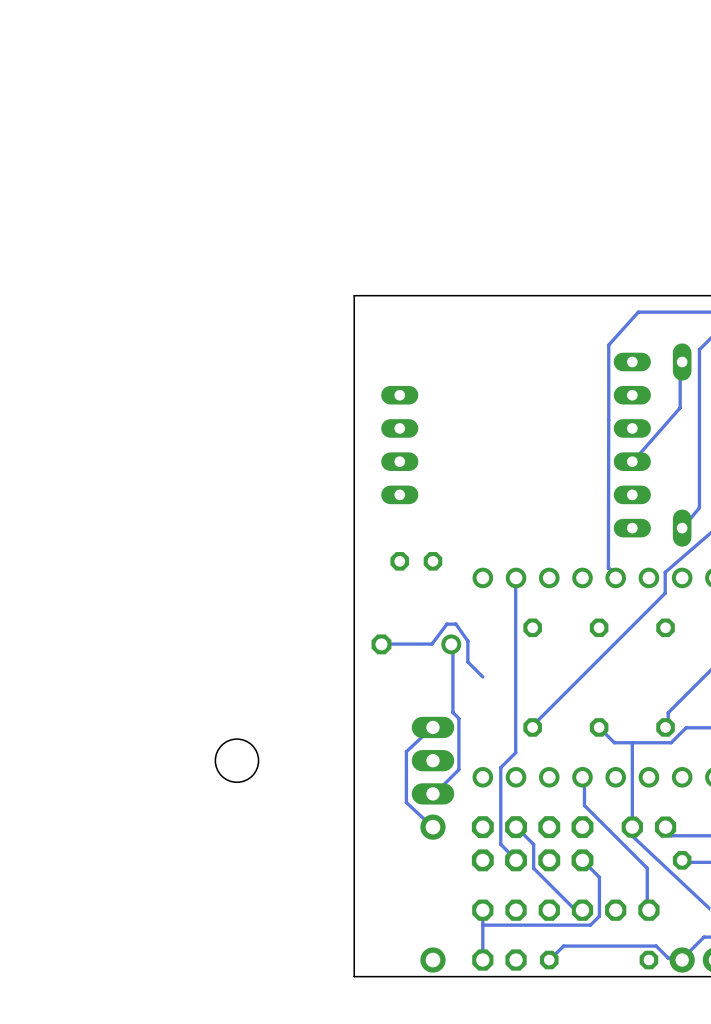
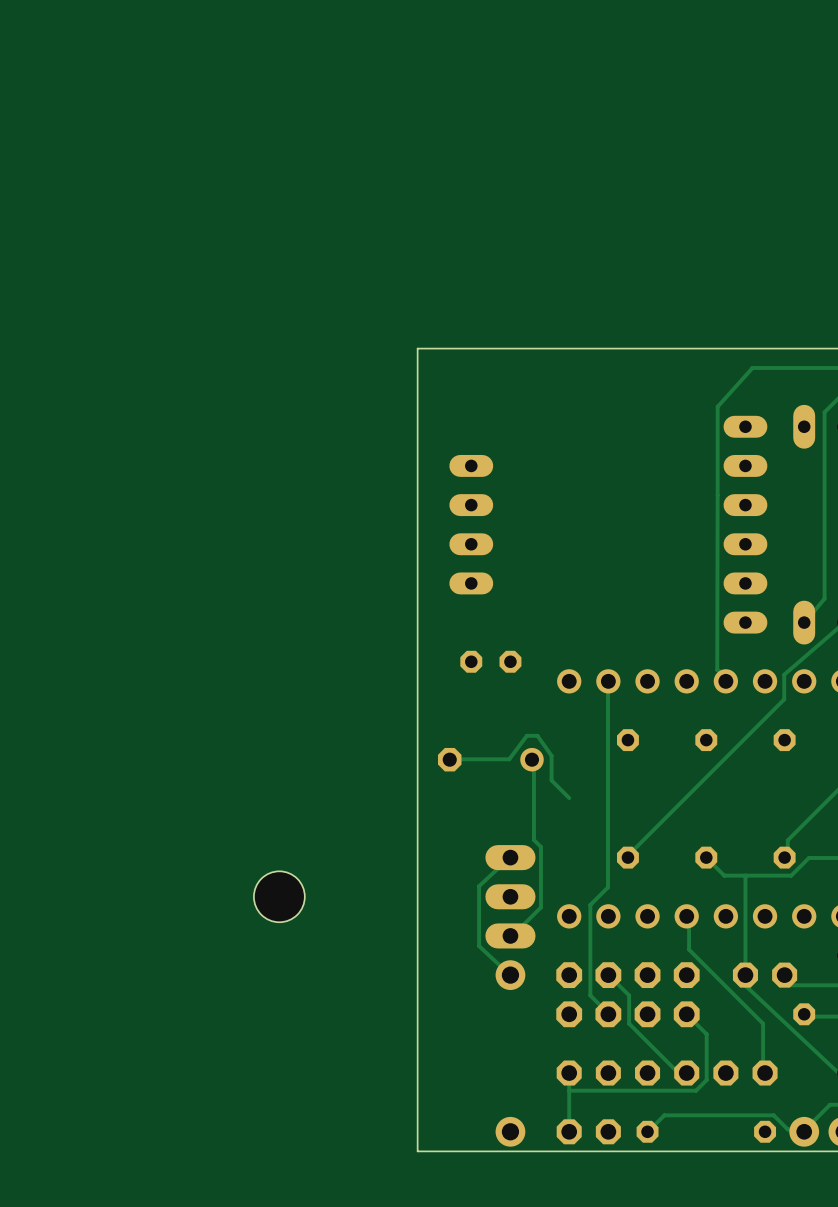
track: (682, 361) (680, 362) (680, 407) (632, 461) -> none

